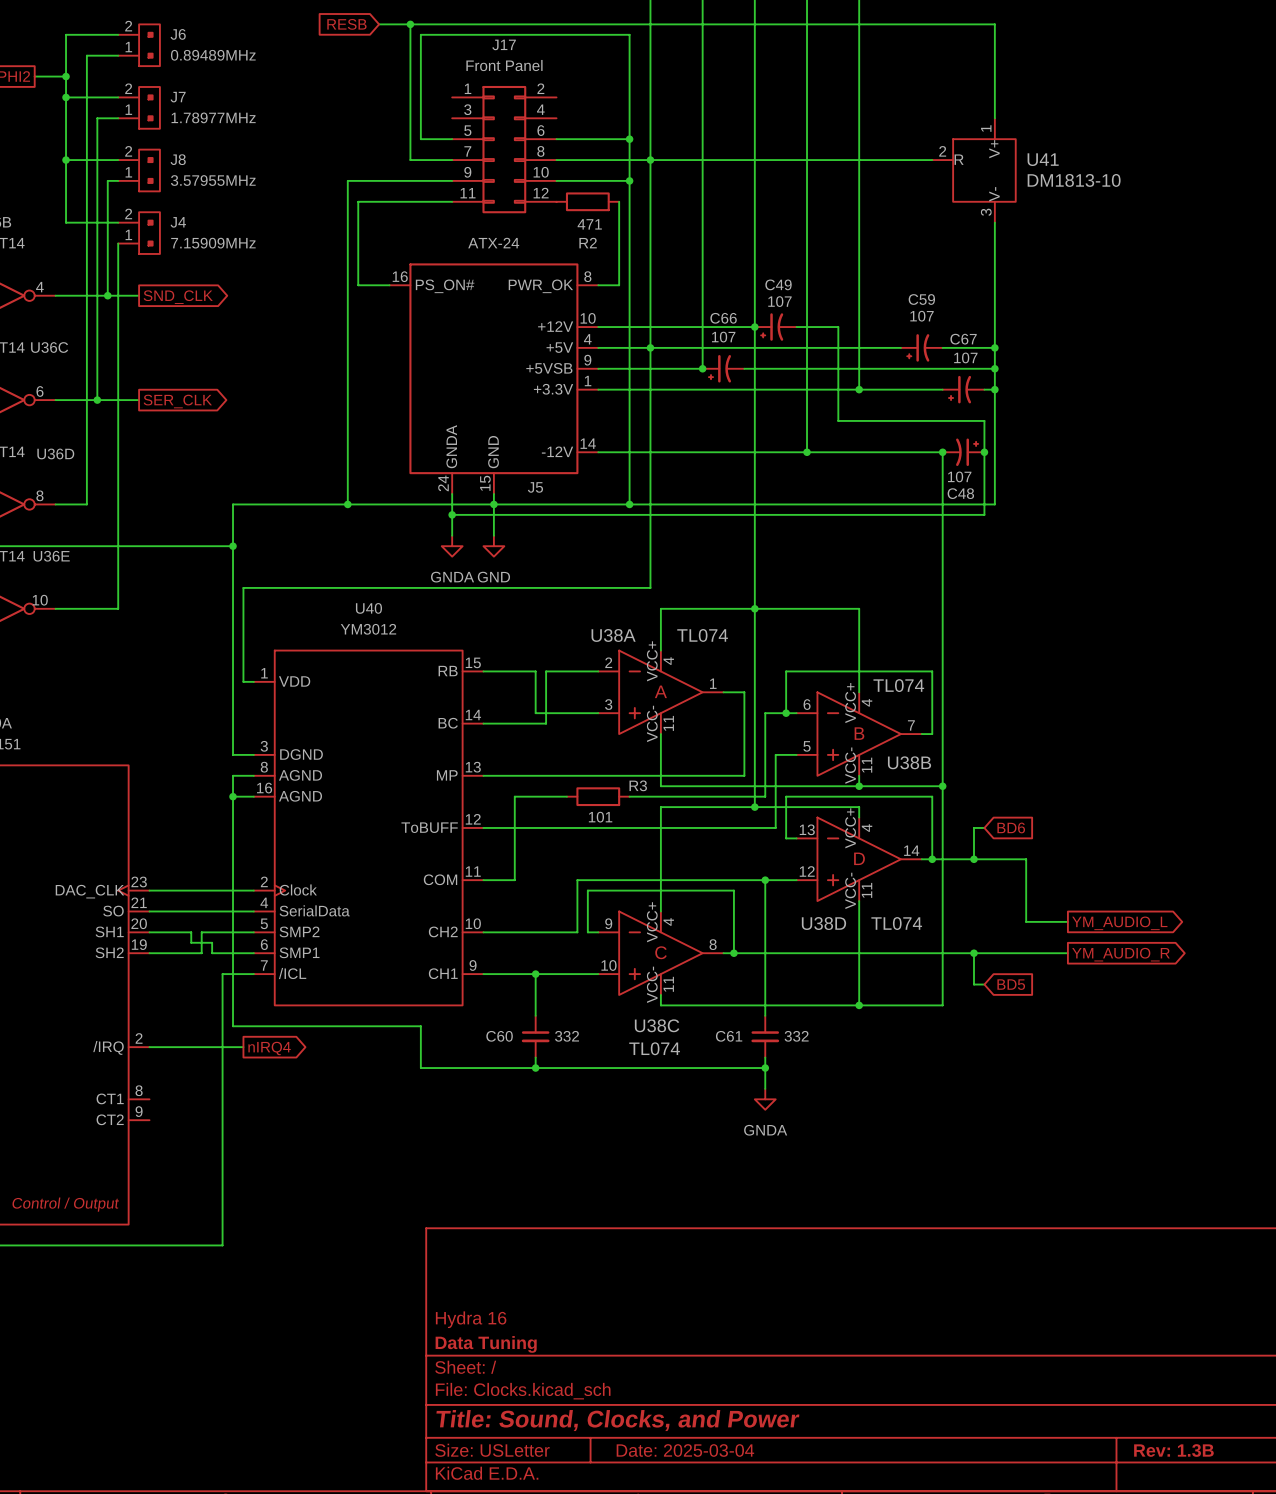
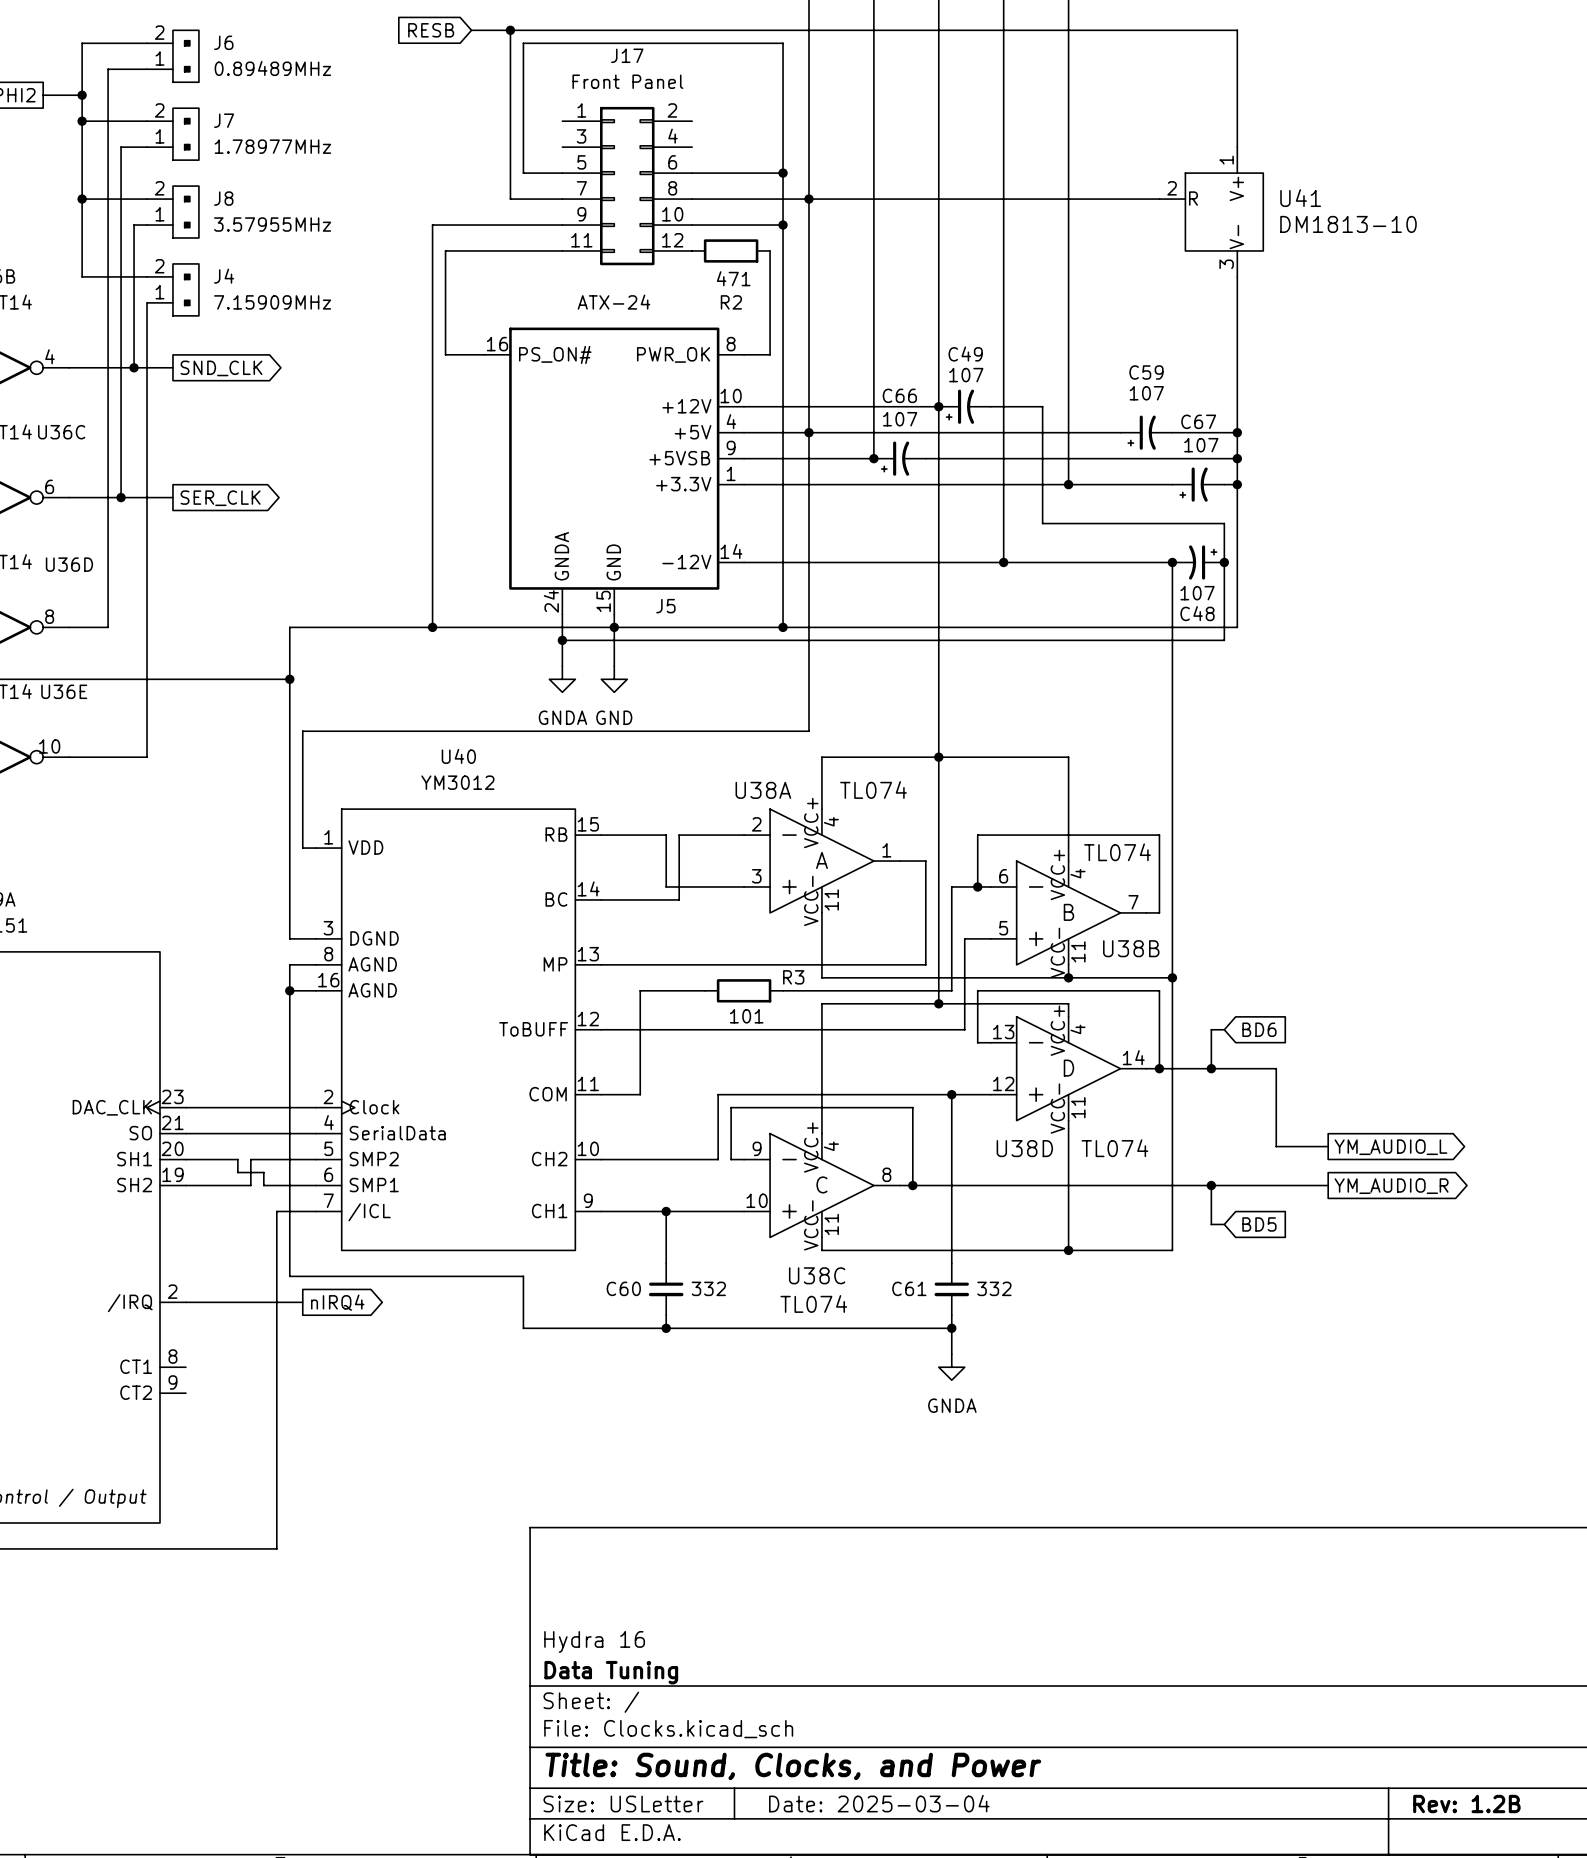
title block: Rev: 1.3B (1173, 1450) -> Rev: 1.2B (1466, 1803)

